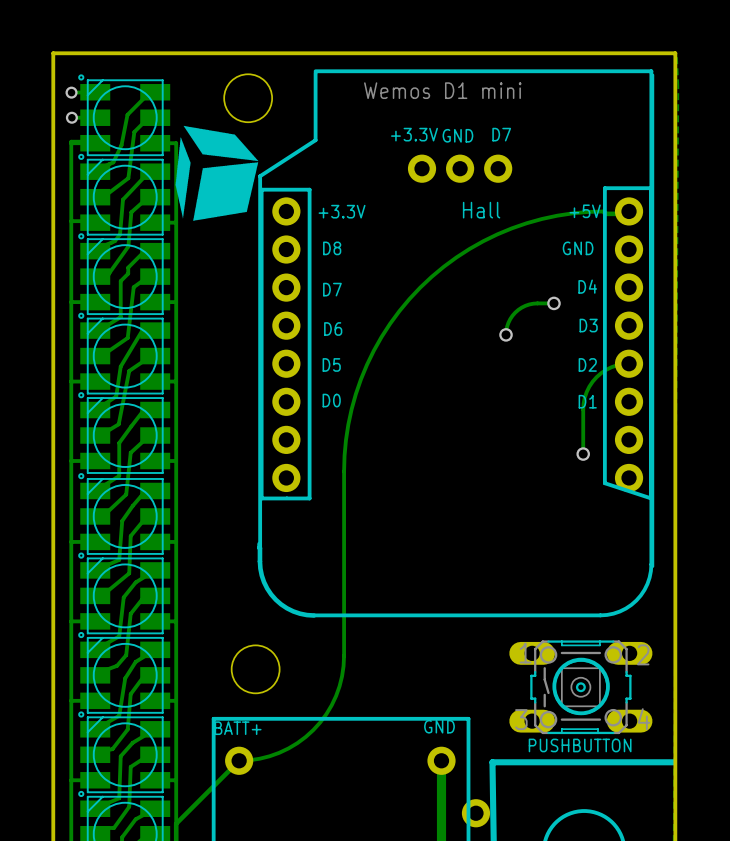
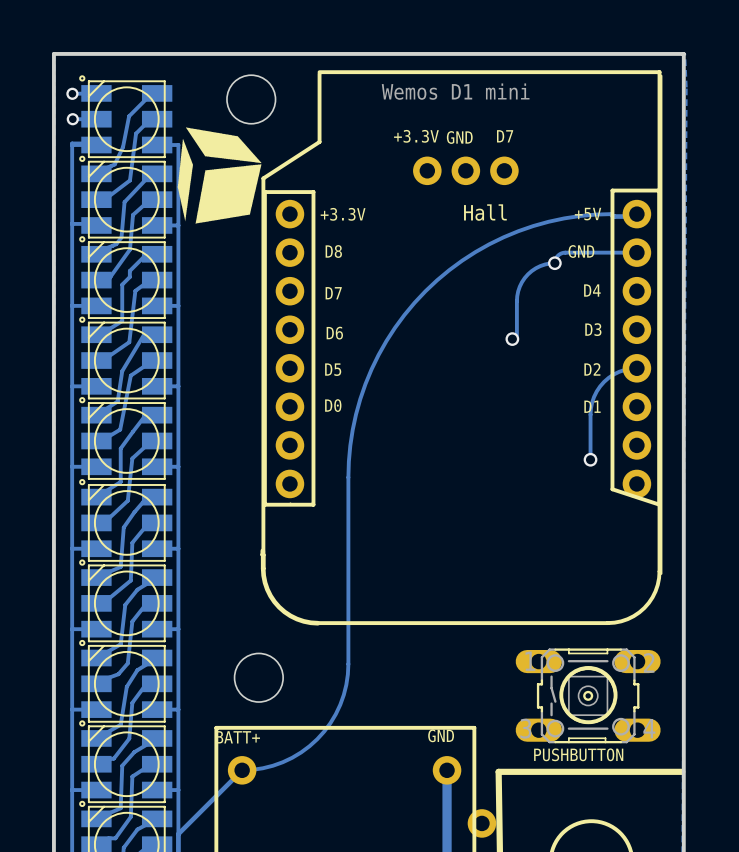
track: none -> (636, 252) (564, 252) (557, 256) (554, 263) (540, 266) (531, 271) (522, 282) (518, 291) (516, 340)
track: (553, 303) (533, 303) (521, 307) (510, 319) (506, 334) -> none
via position: (553, 303) -> (554, 263)

